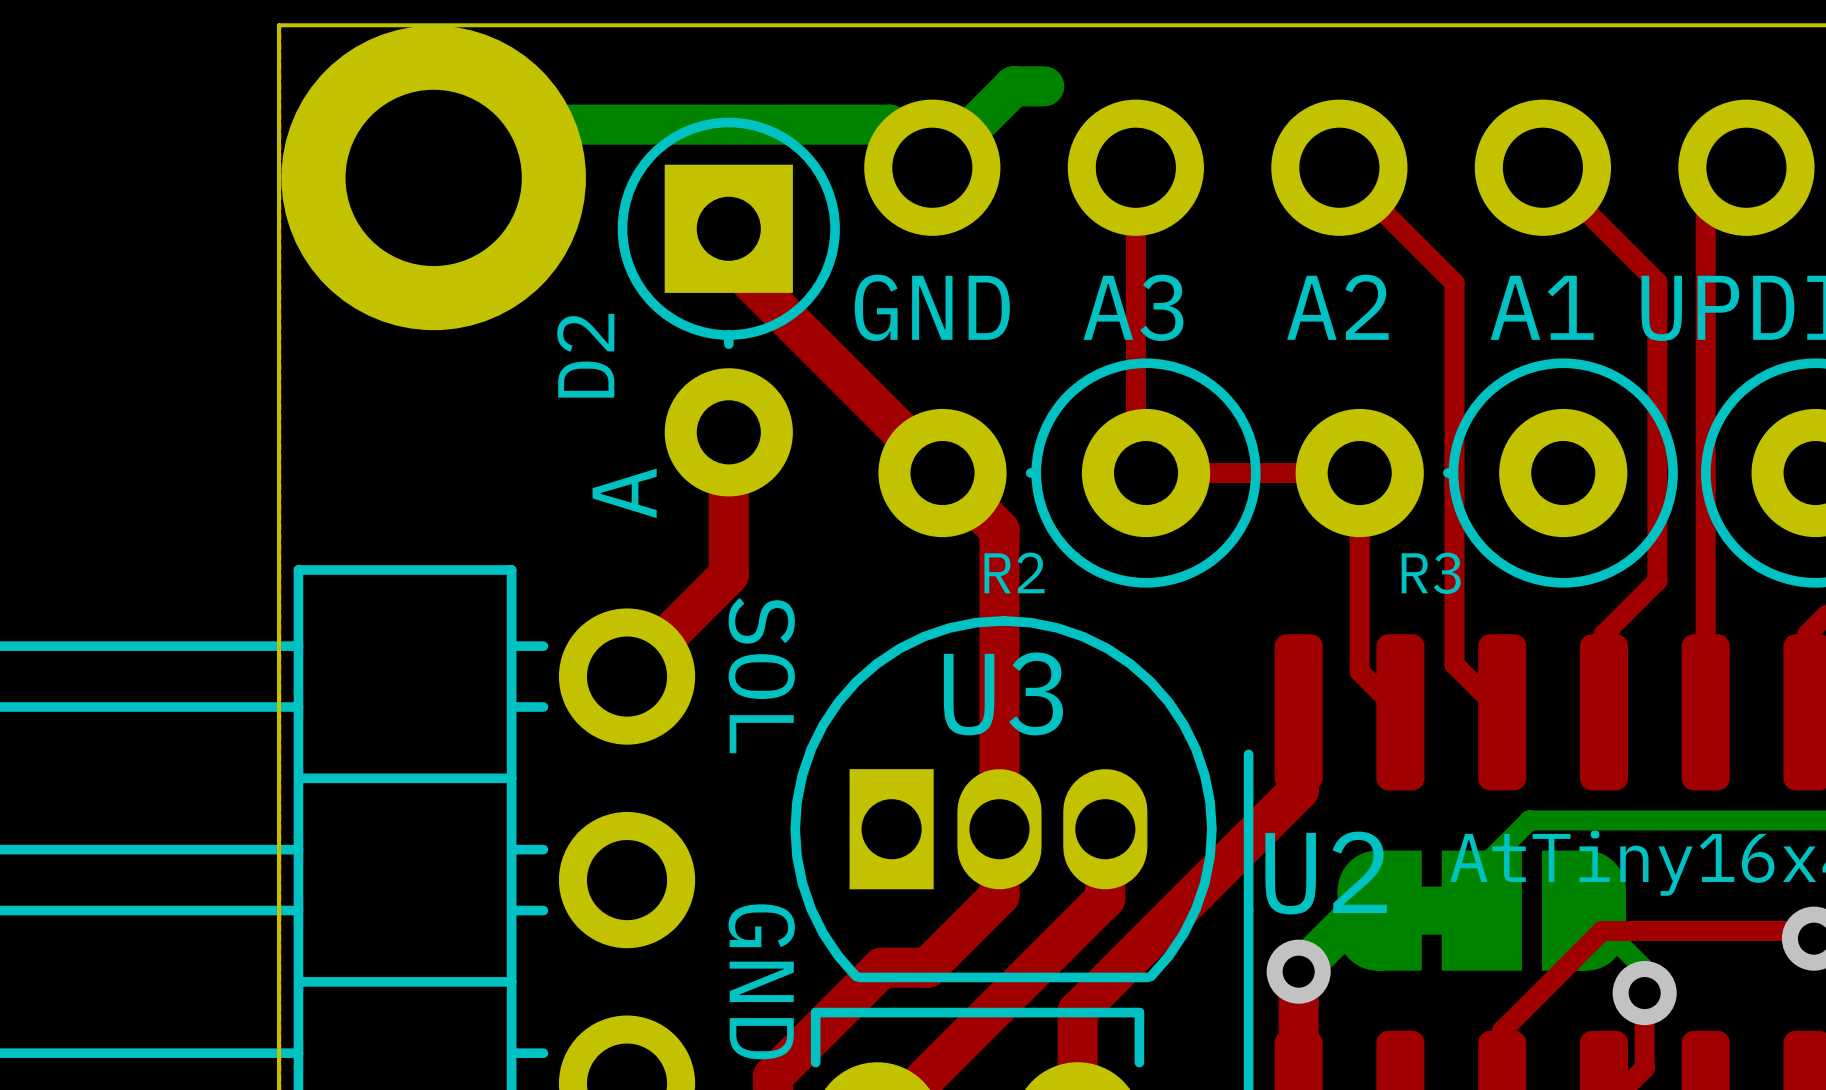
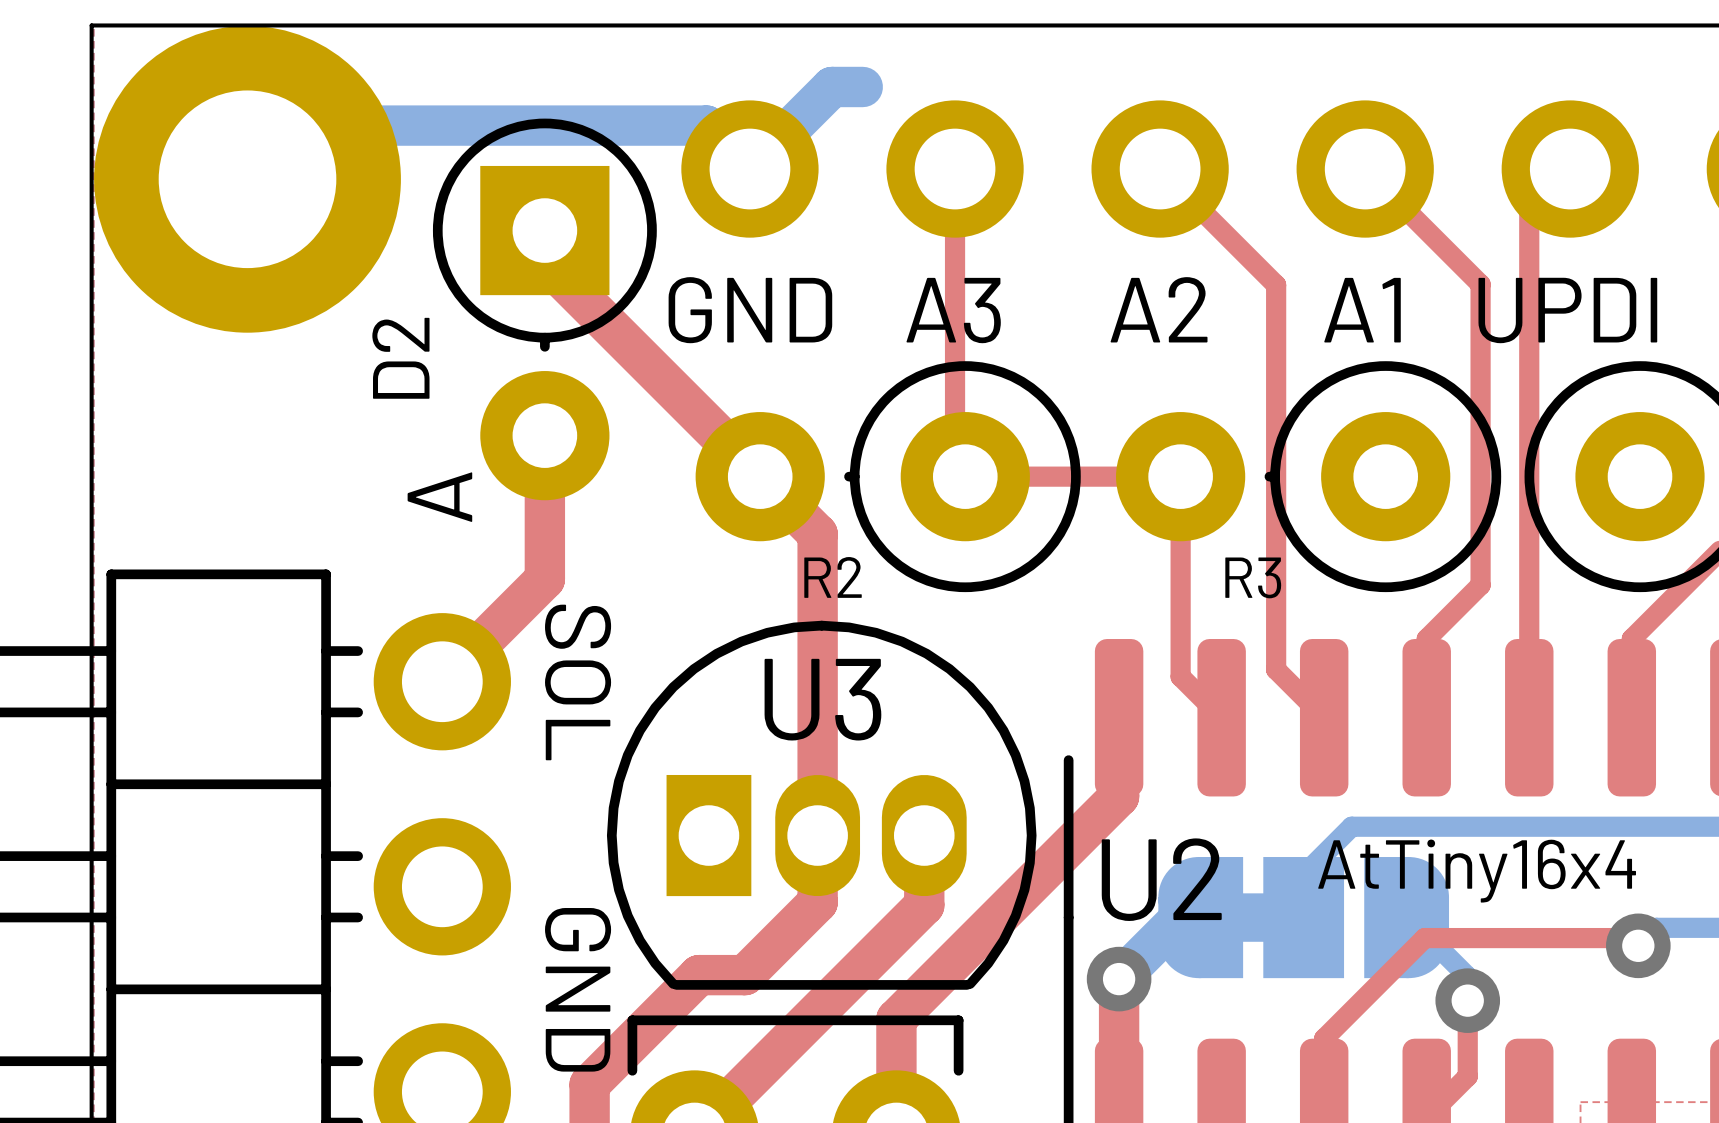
U2 name position: U2 (1326, 873) -> U2 (1161, 879)

